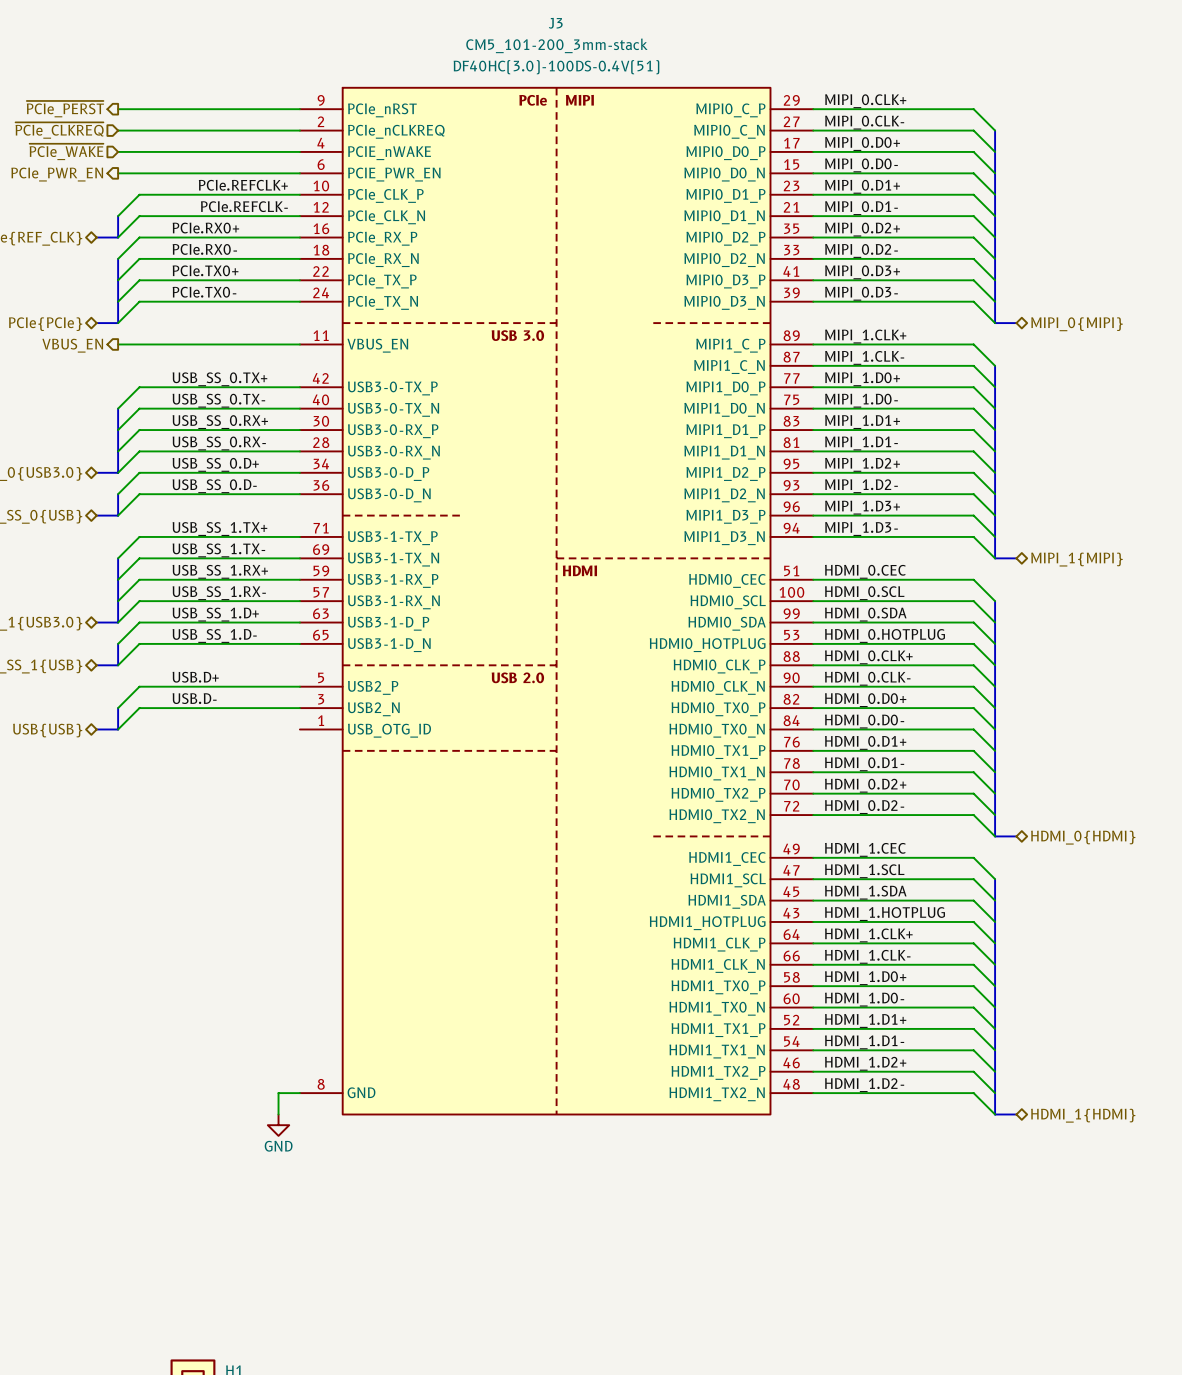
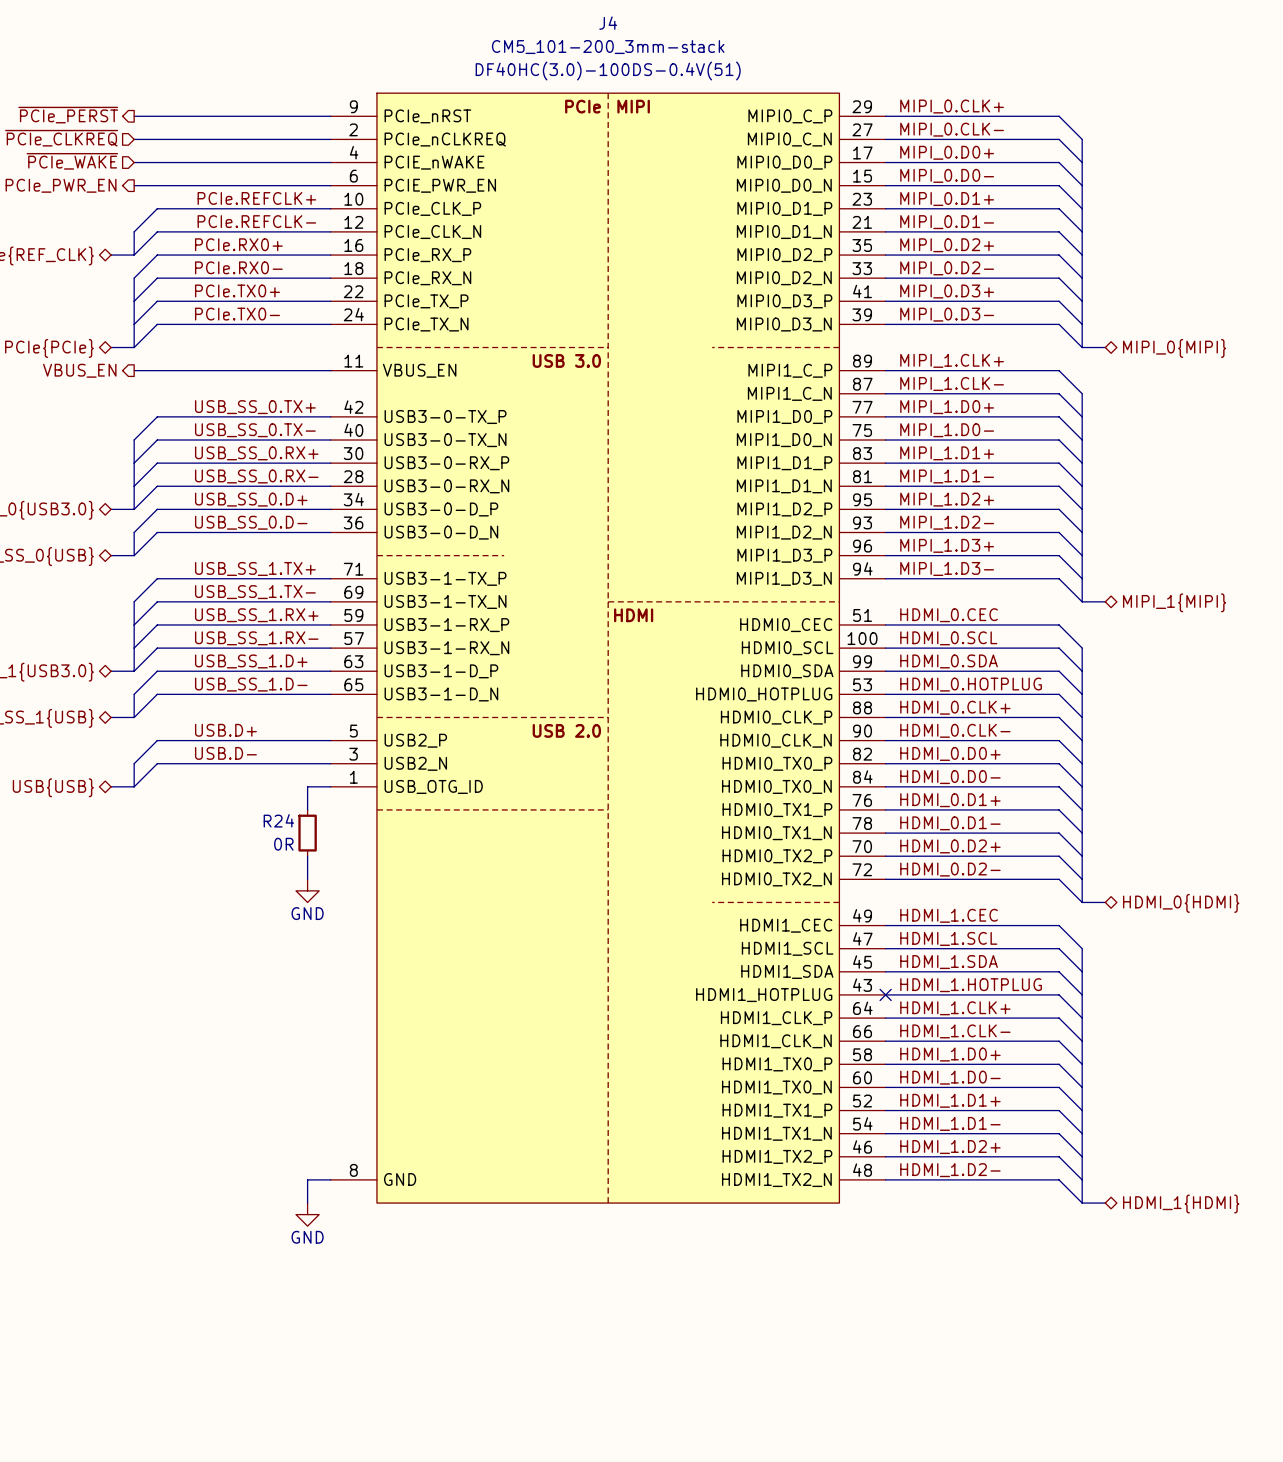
J3 name: J3 (555, 23) -> J4 (608, 23)
wire: none -> (330, 786) (307, 786) (307, 809)
R24: none -> (307, 833)
wire: none -> (307, 856) (307, 879)
power symbol: none -> GND (307, 890)
no-connect mark: none -> (885, 994)

